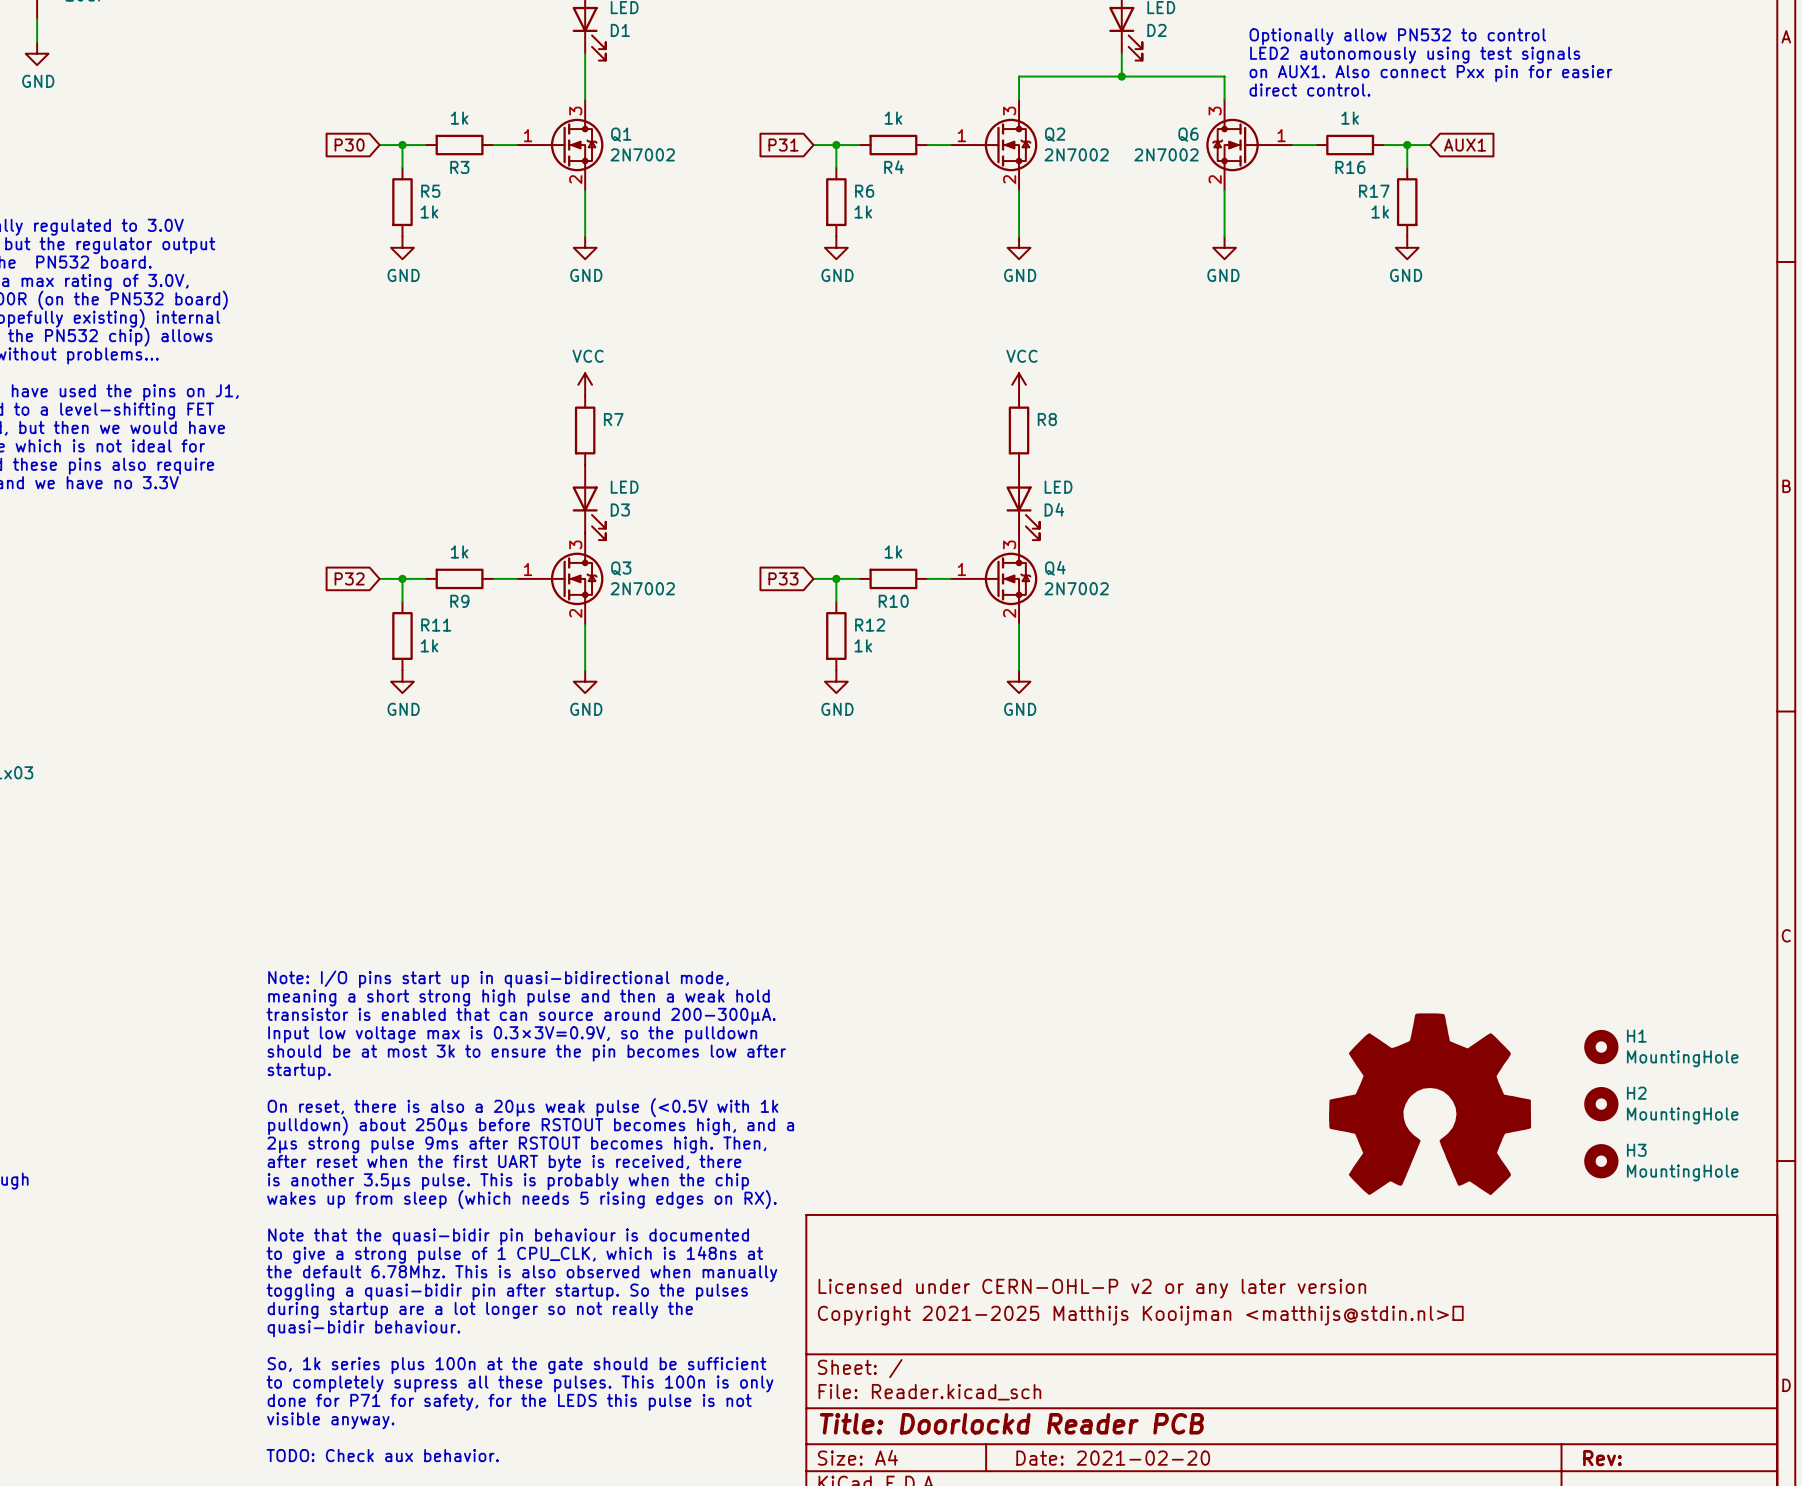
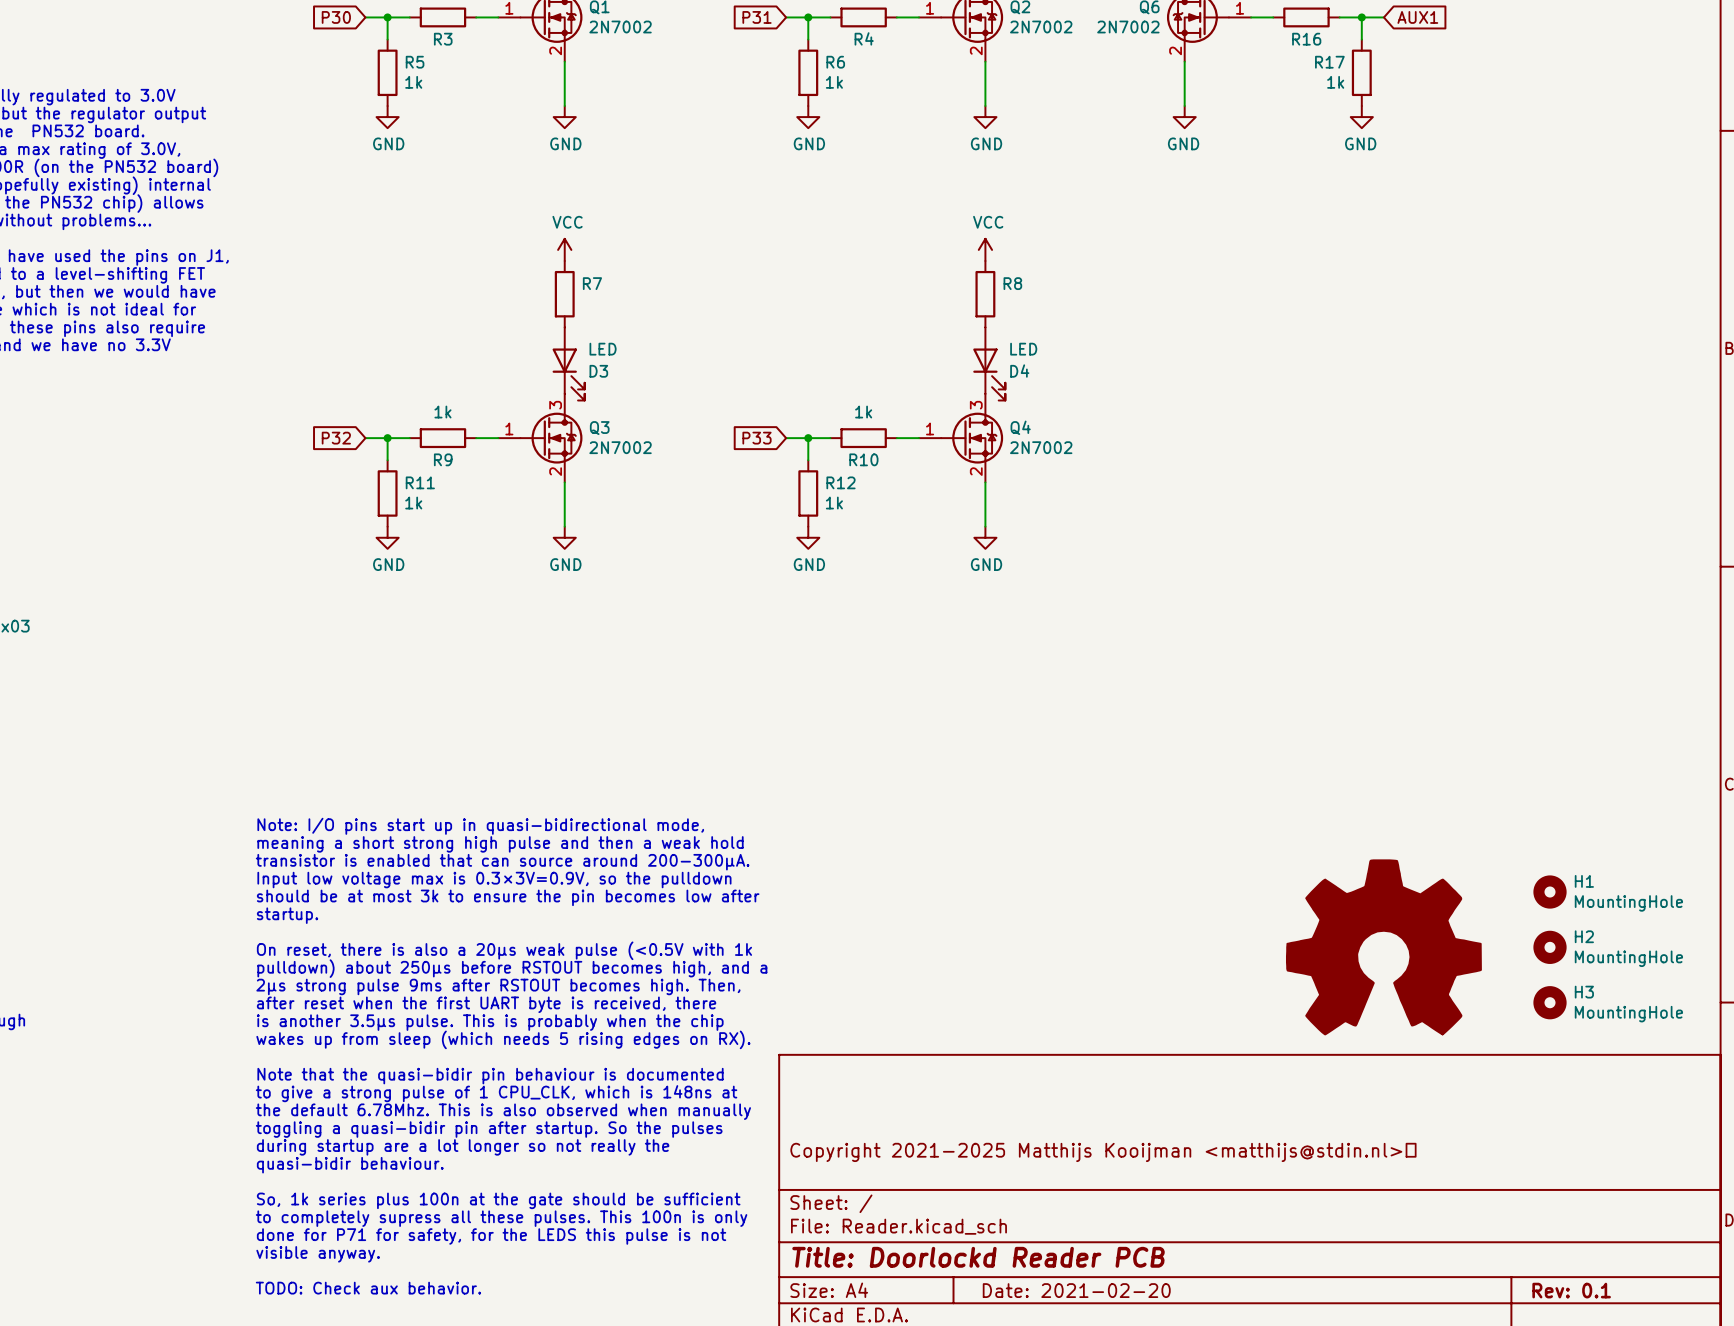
title block: Licensed under CERN-OHL-P v2 or any later version (1092, 1288) -> none
title block: Rev: (1602, 1458) -> Rev: 0.1 (1571, 1290)

